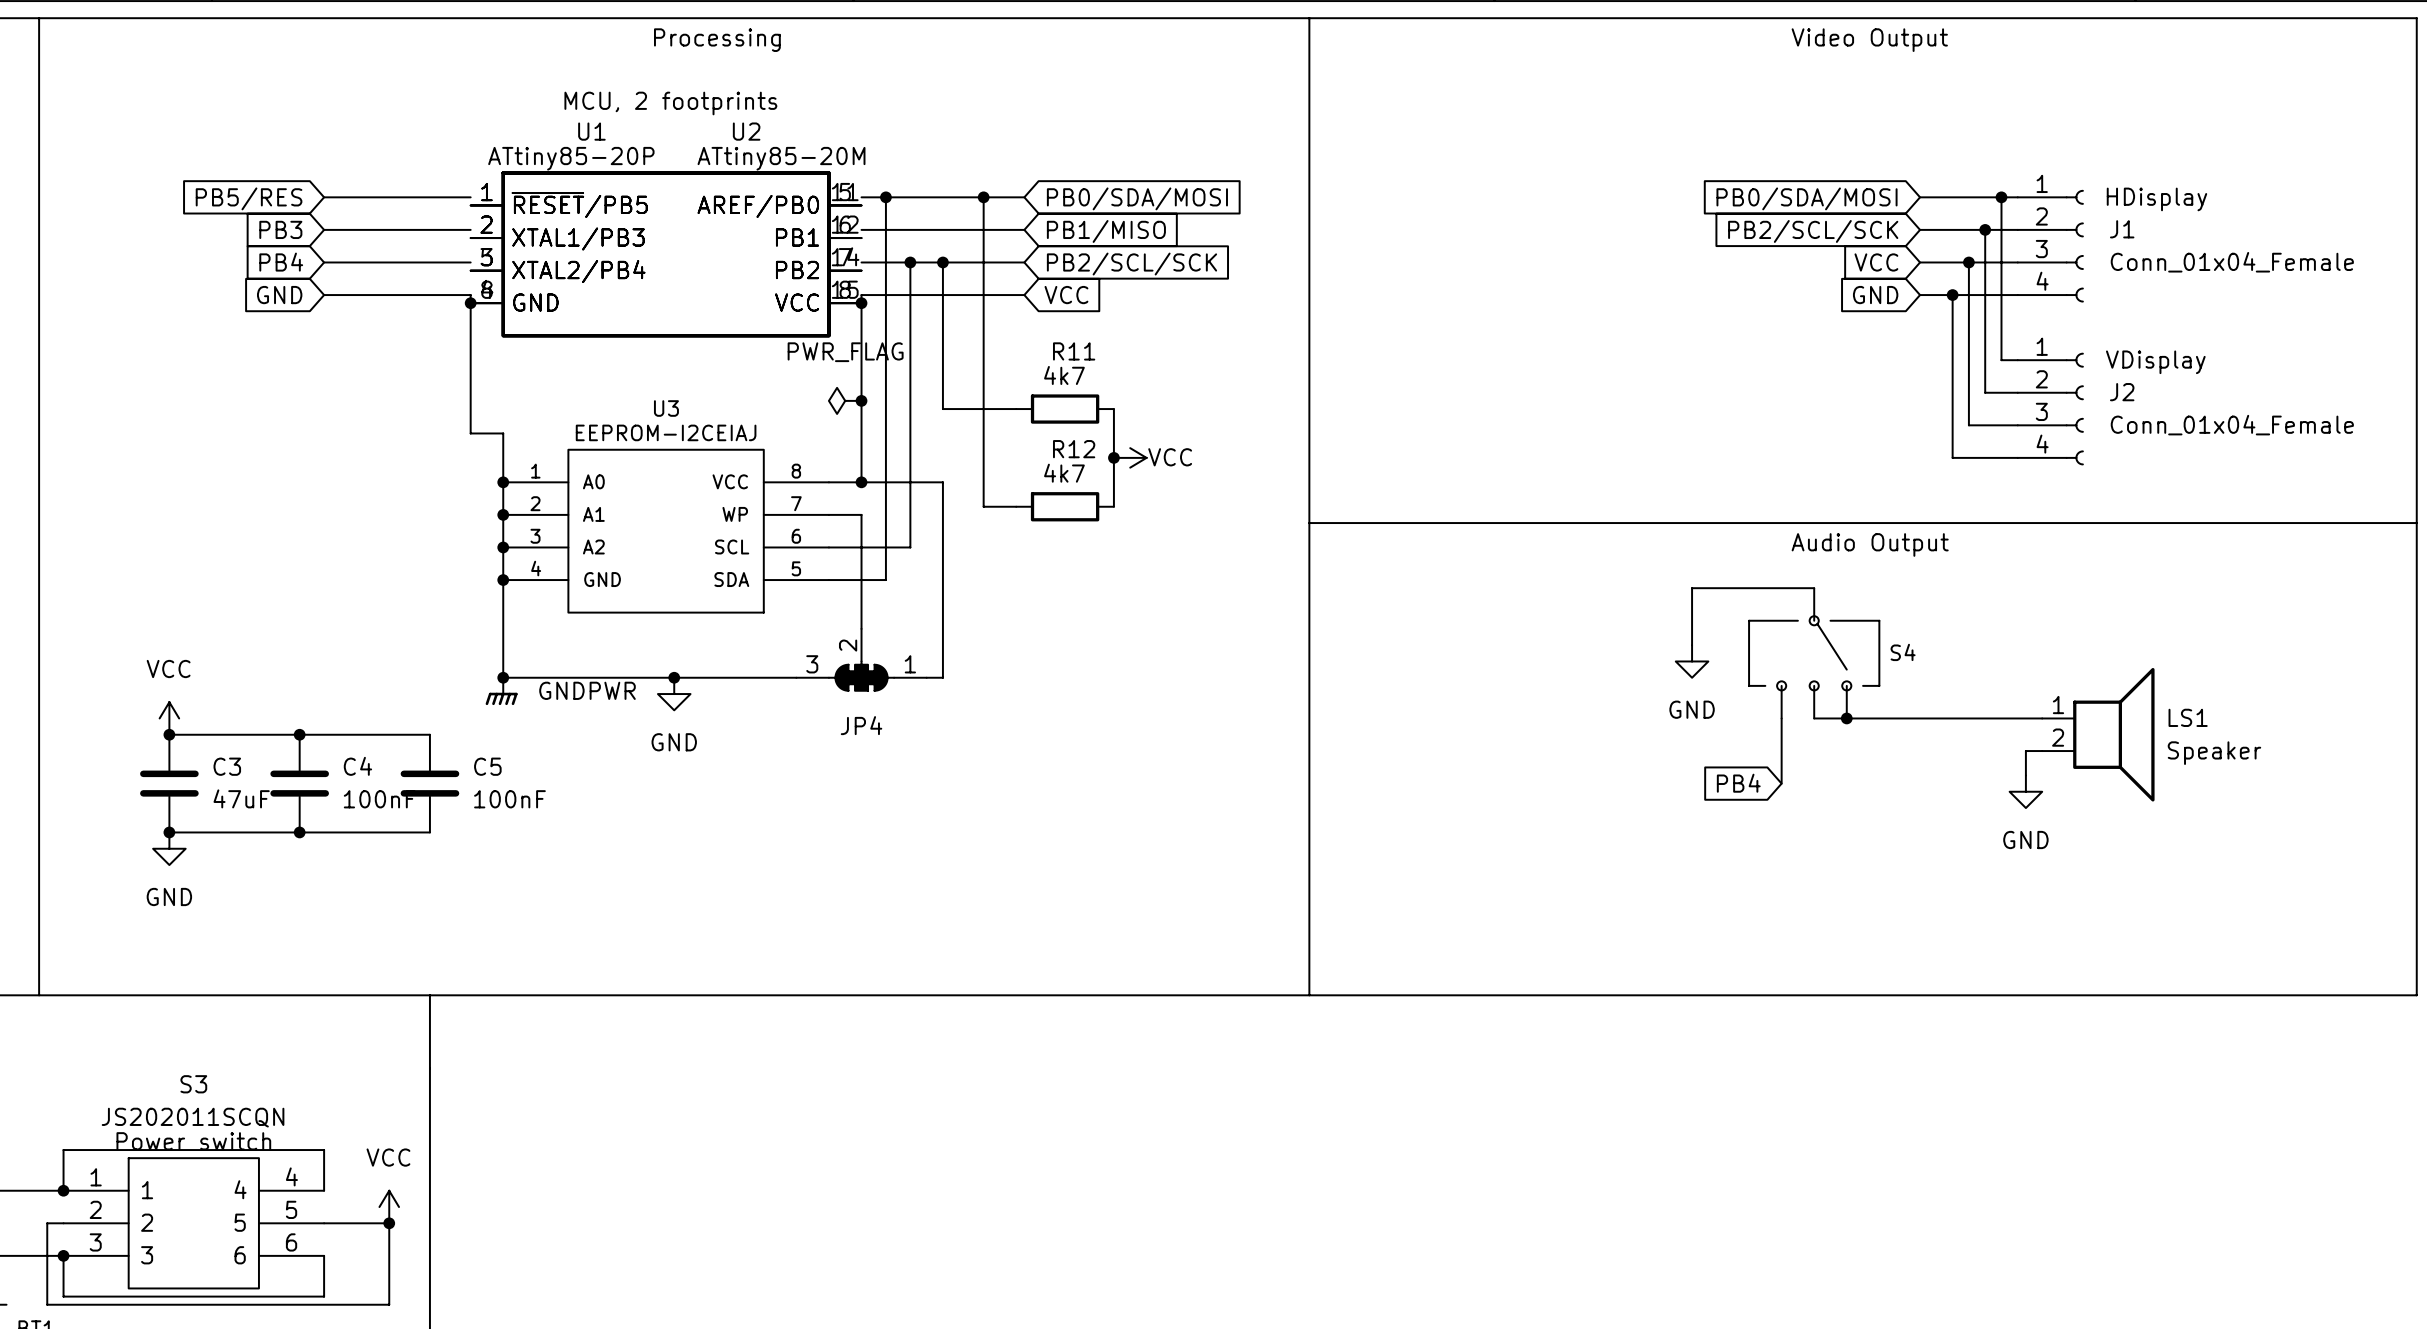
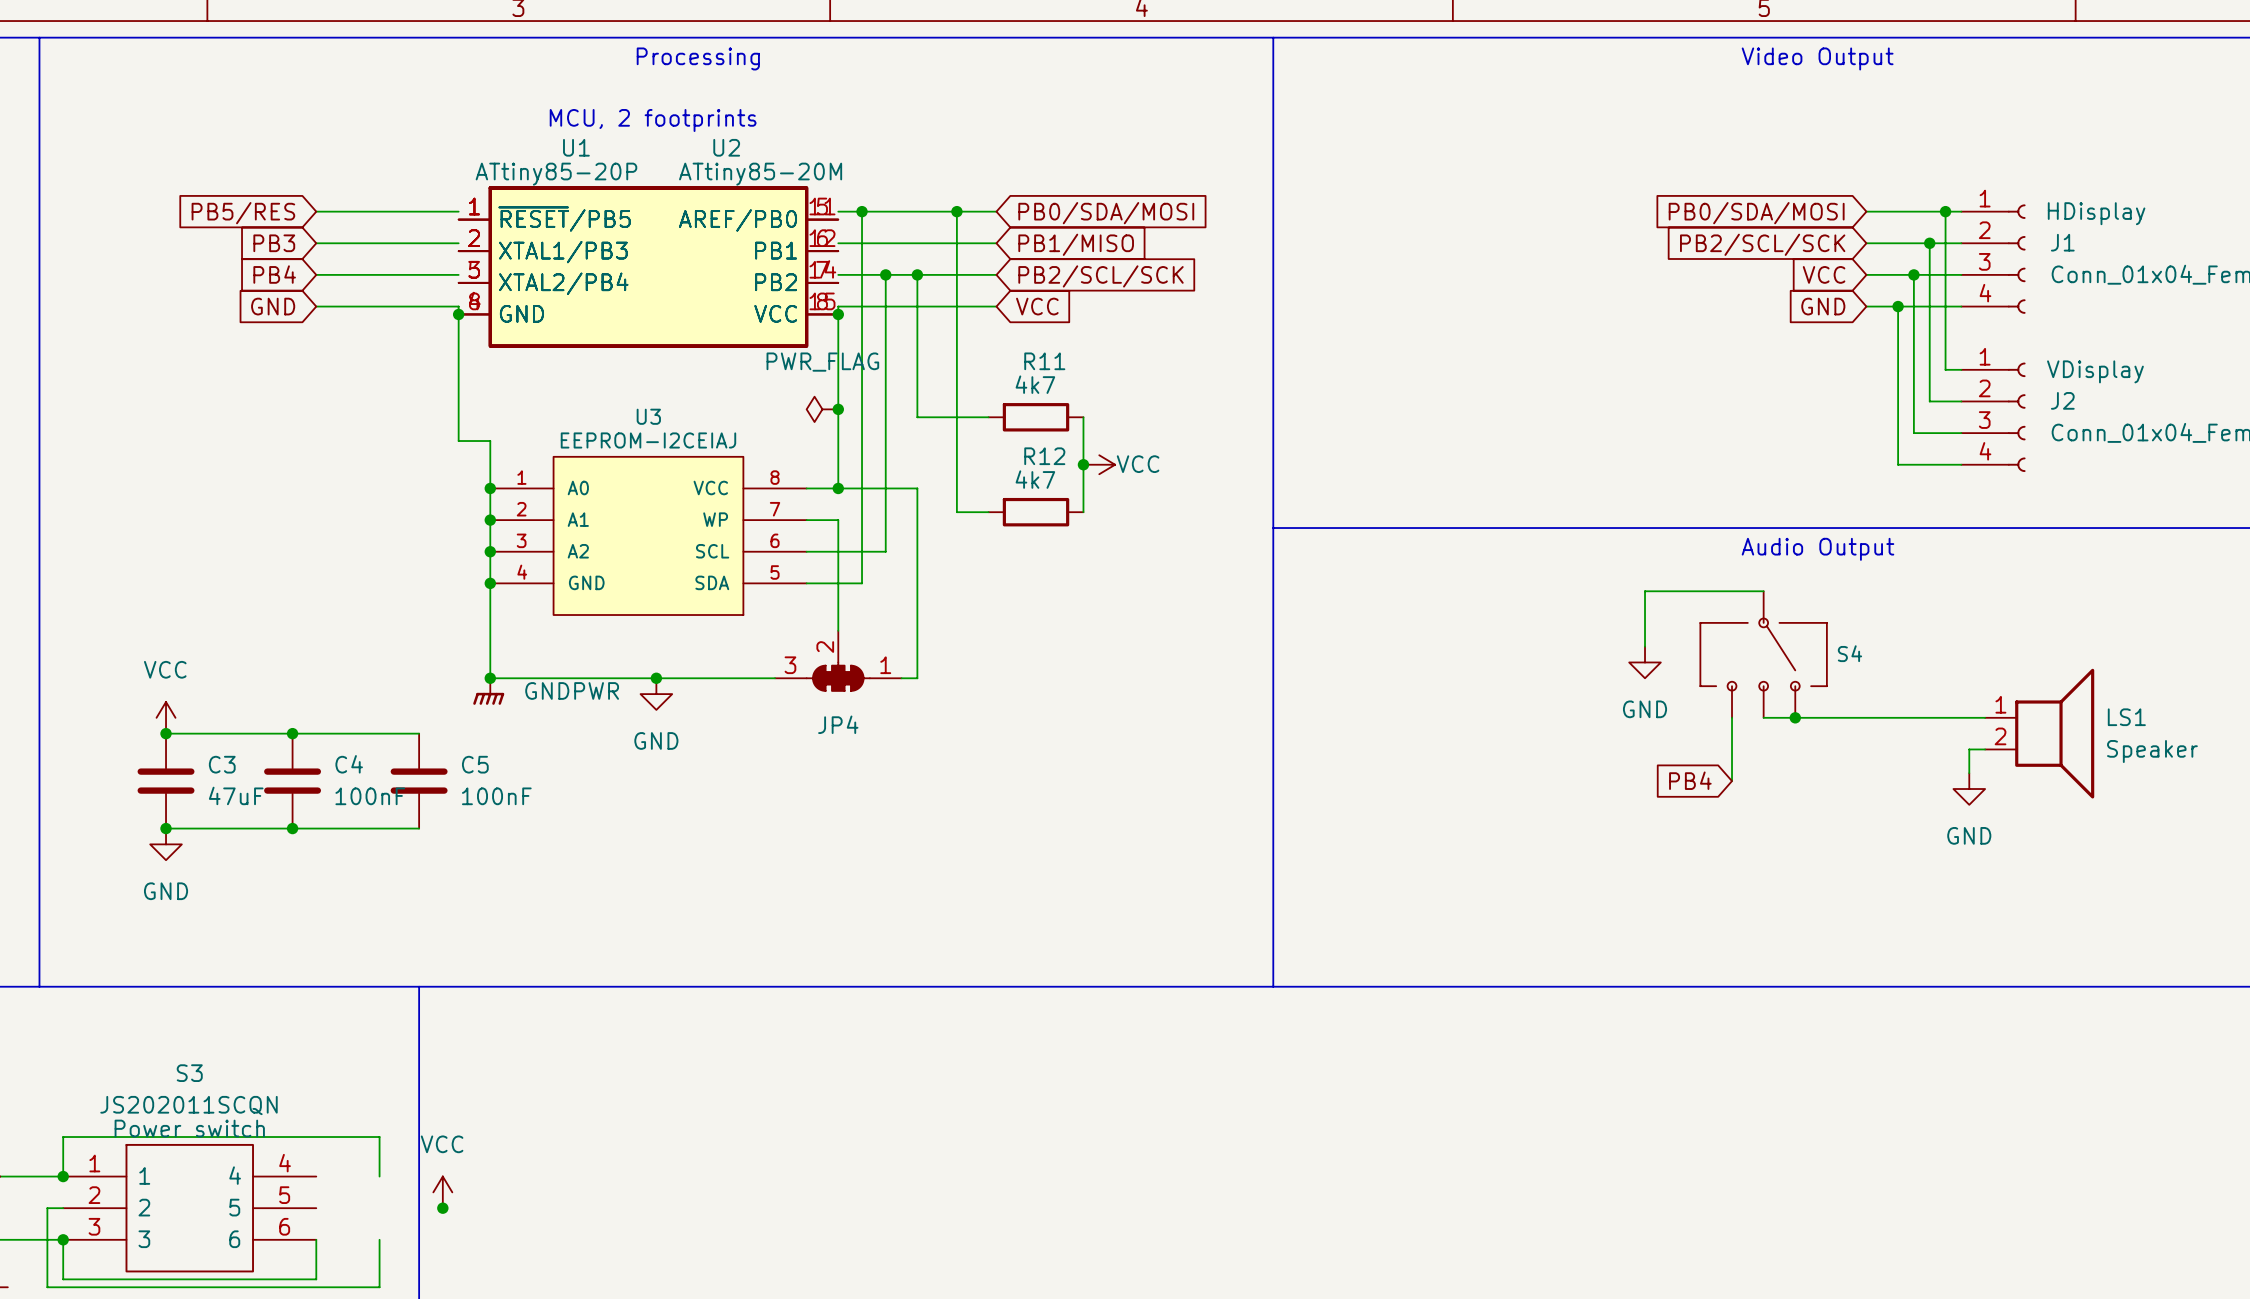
wire: (324, 1150) (324, 1190) -> (316, 1137) (379, 1137) (379, 1176)
power symbol position: VCC (389, 1207) -> VCC (442, 1192)
wire: (324, 1223) (389, 1223) (389, 1255) -> none
junction position: (389, 1223) -> (442, 1208)

